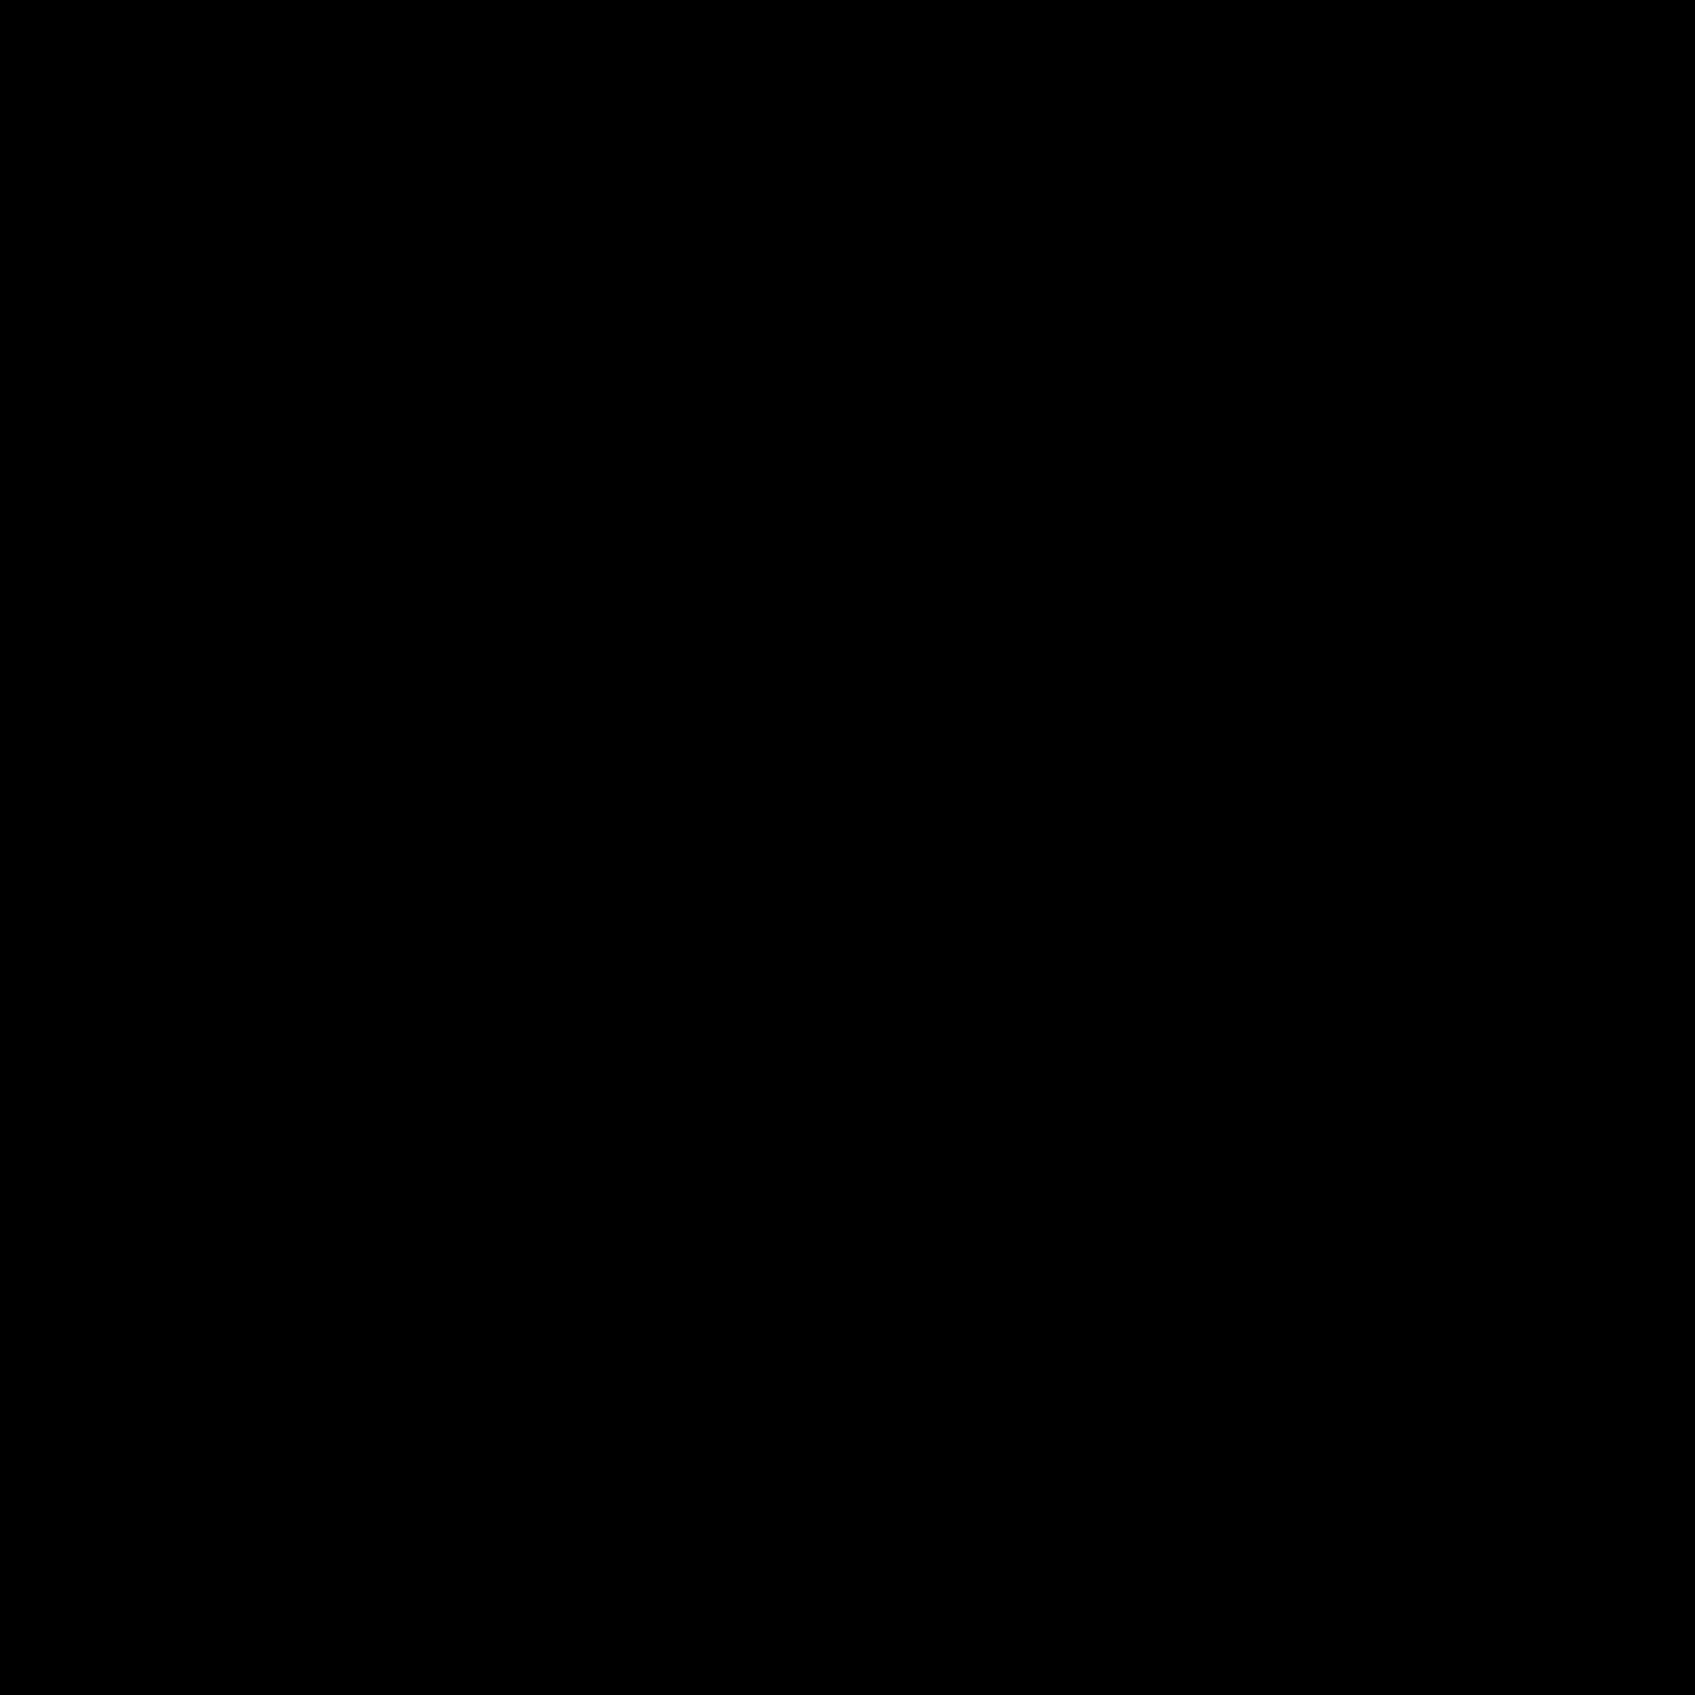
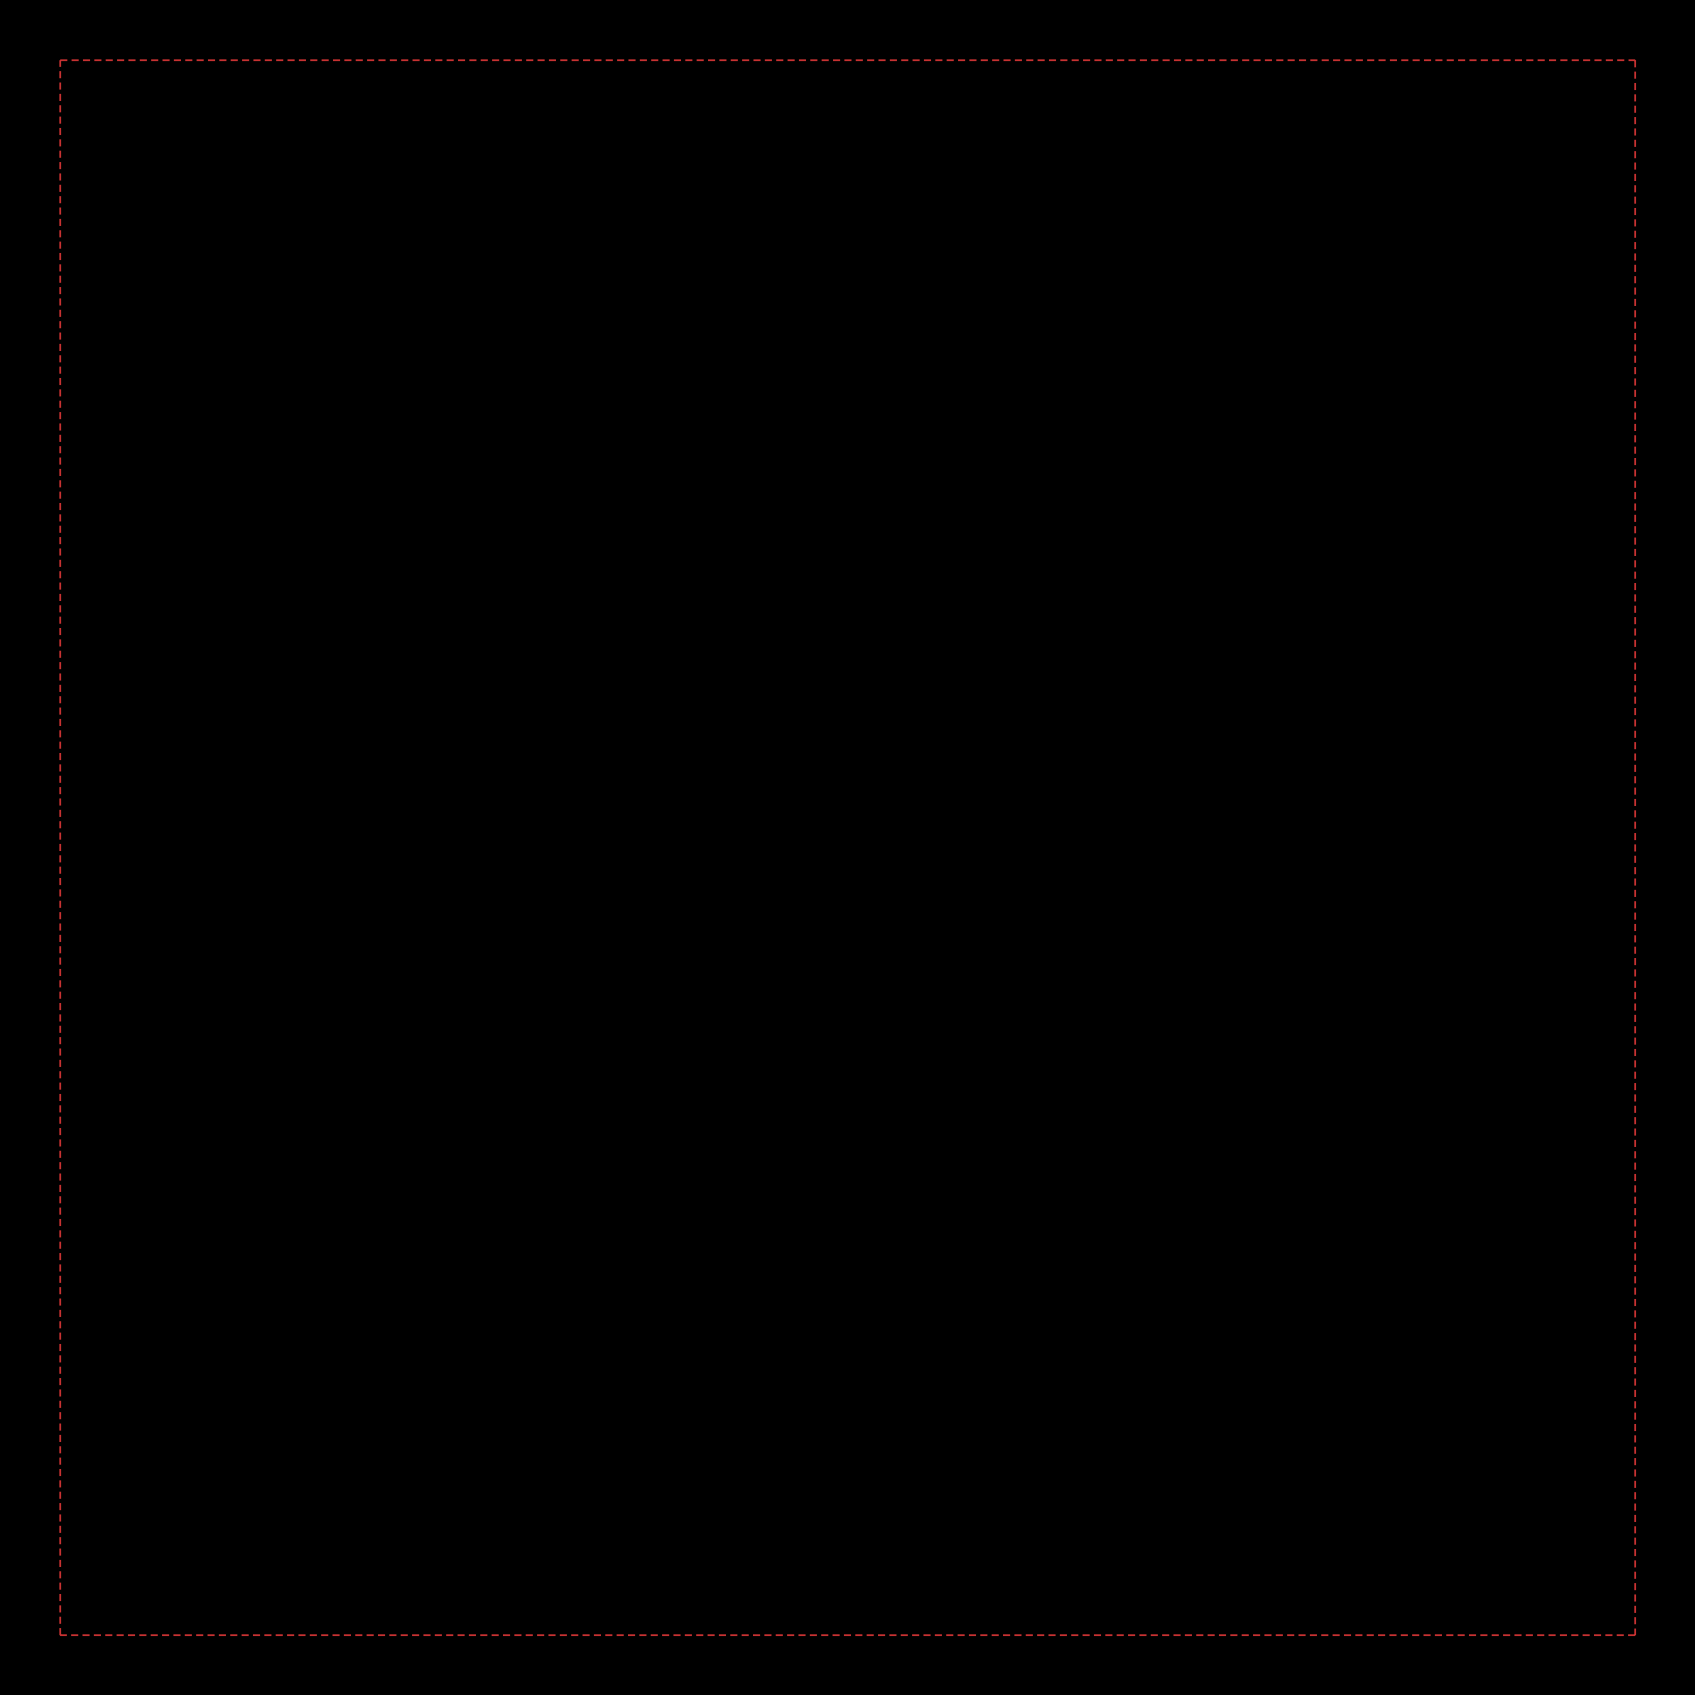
zone outline: none -> (60, 60) (60, 1635) (1635, 1635) (1635, 60) (60, 60)

